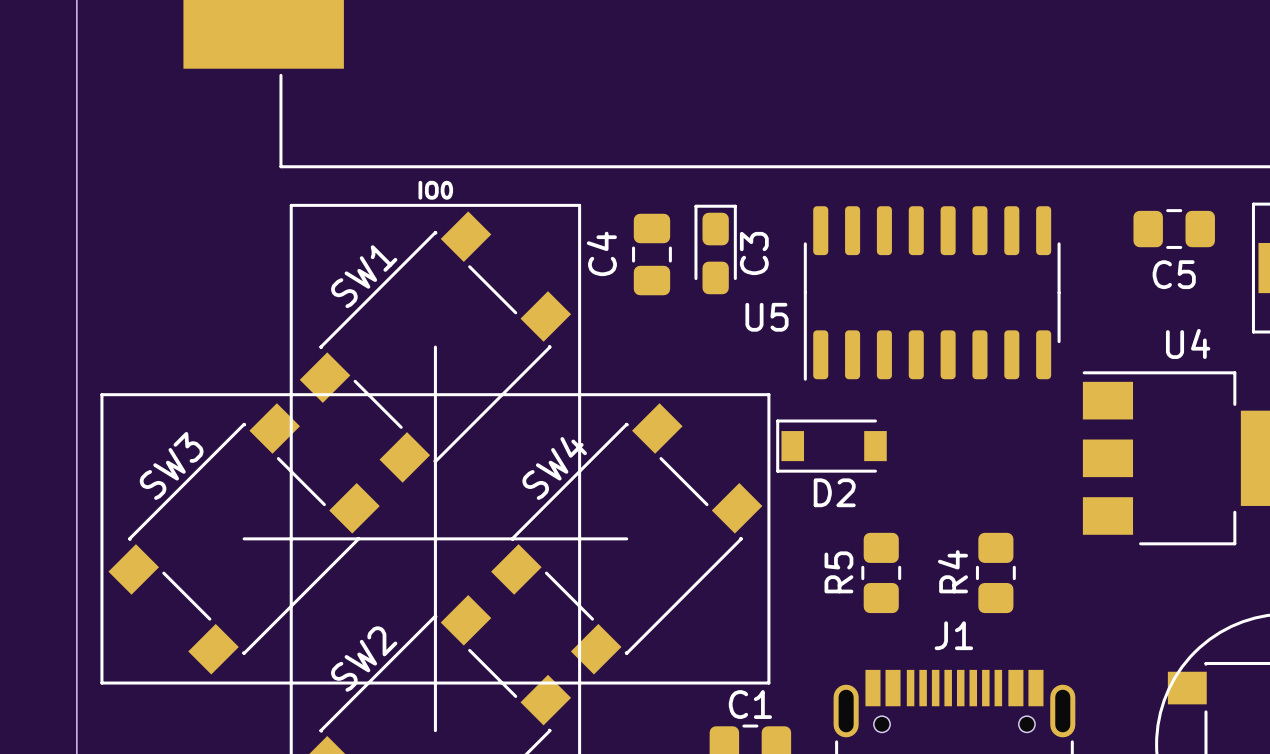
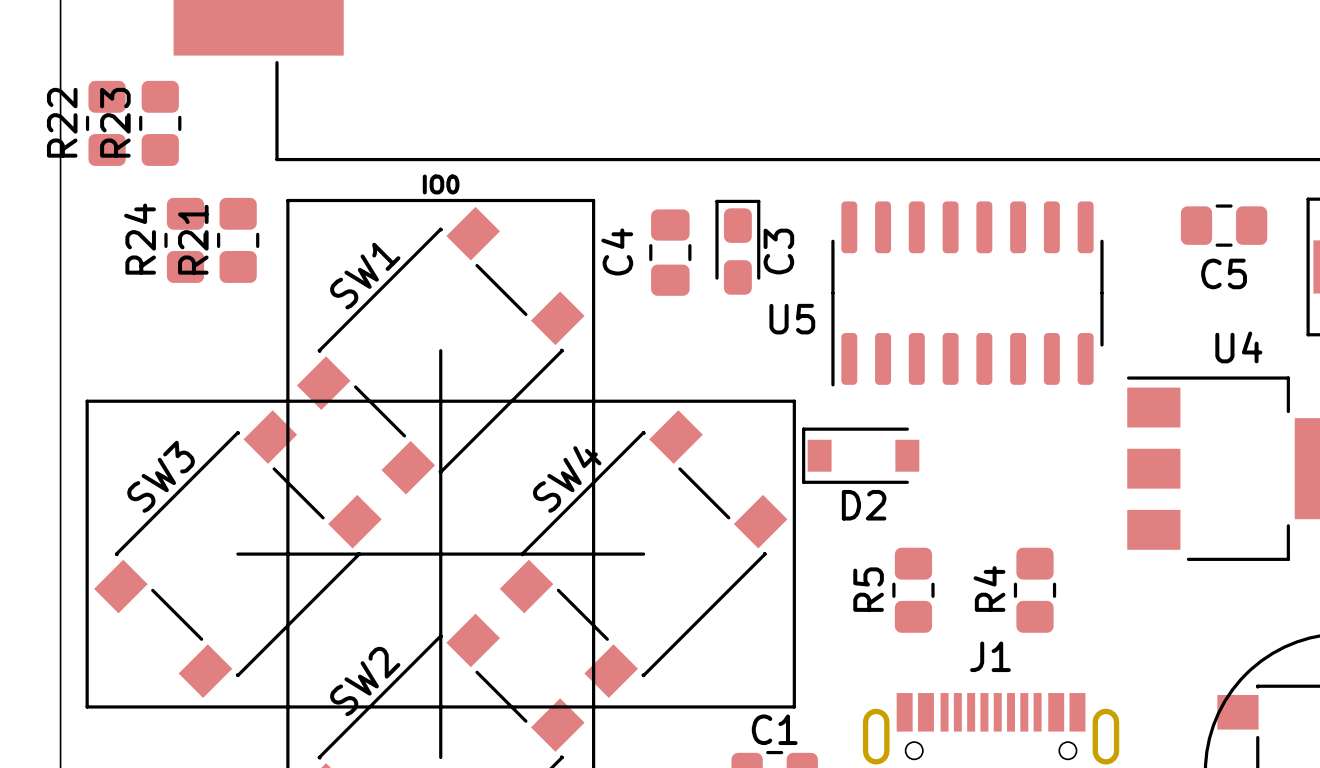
R22: none -> (107, 123)
R23: none -> (160, 123)
R24: none -> (185, 240)
R21: none -> (238, 240)

